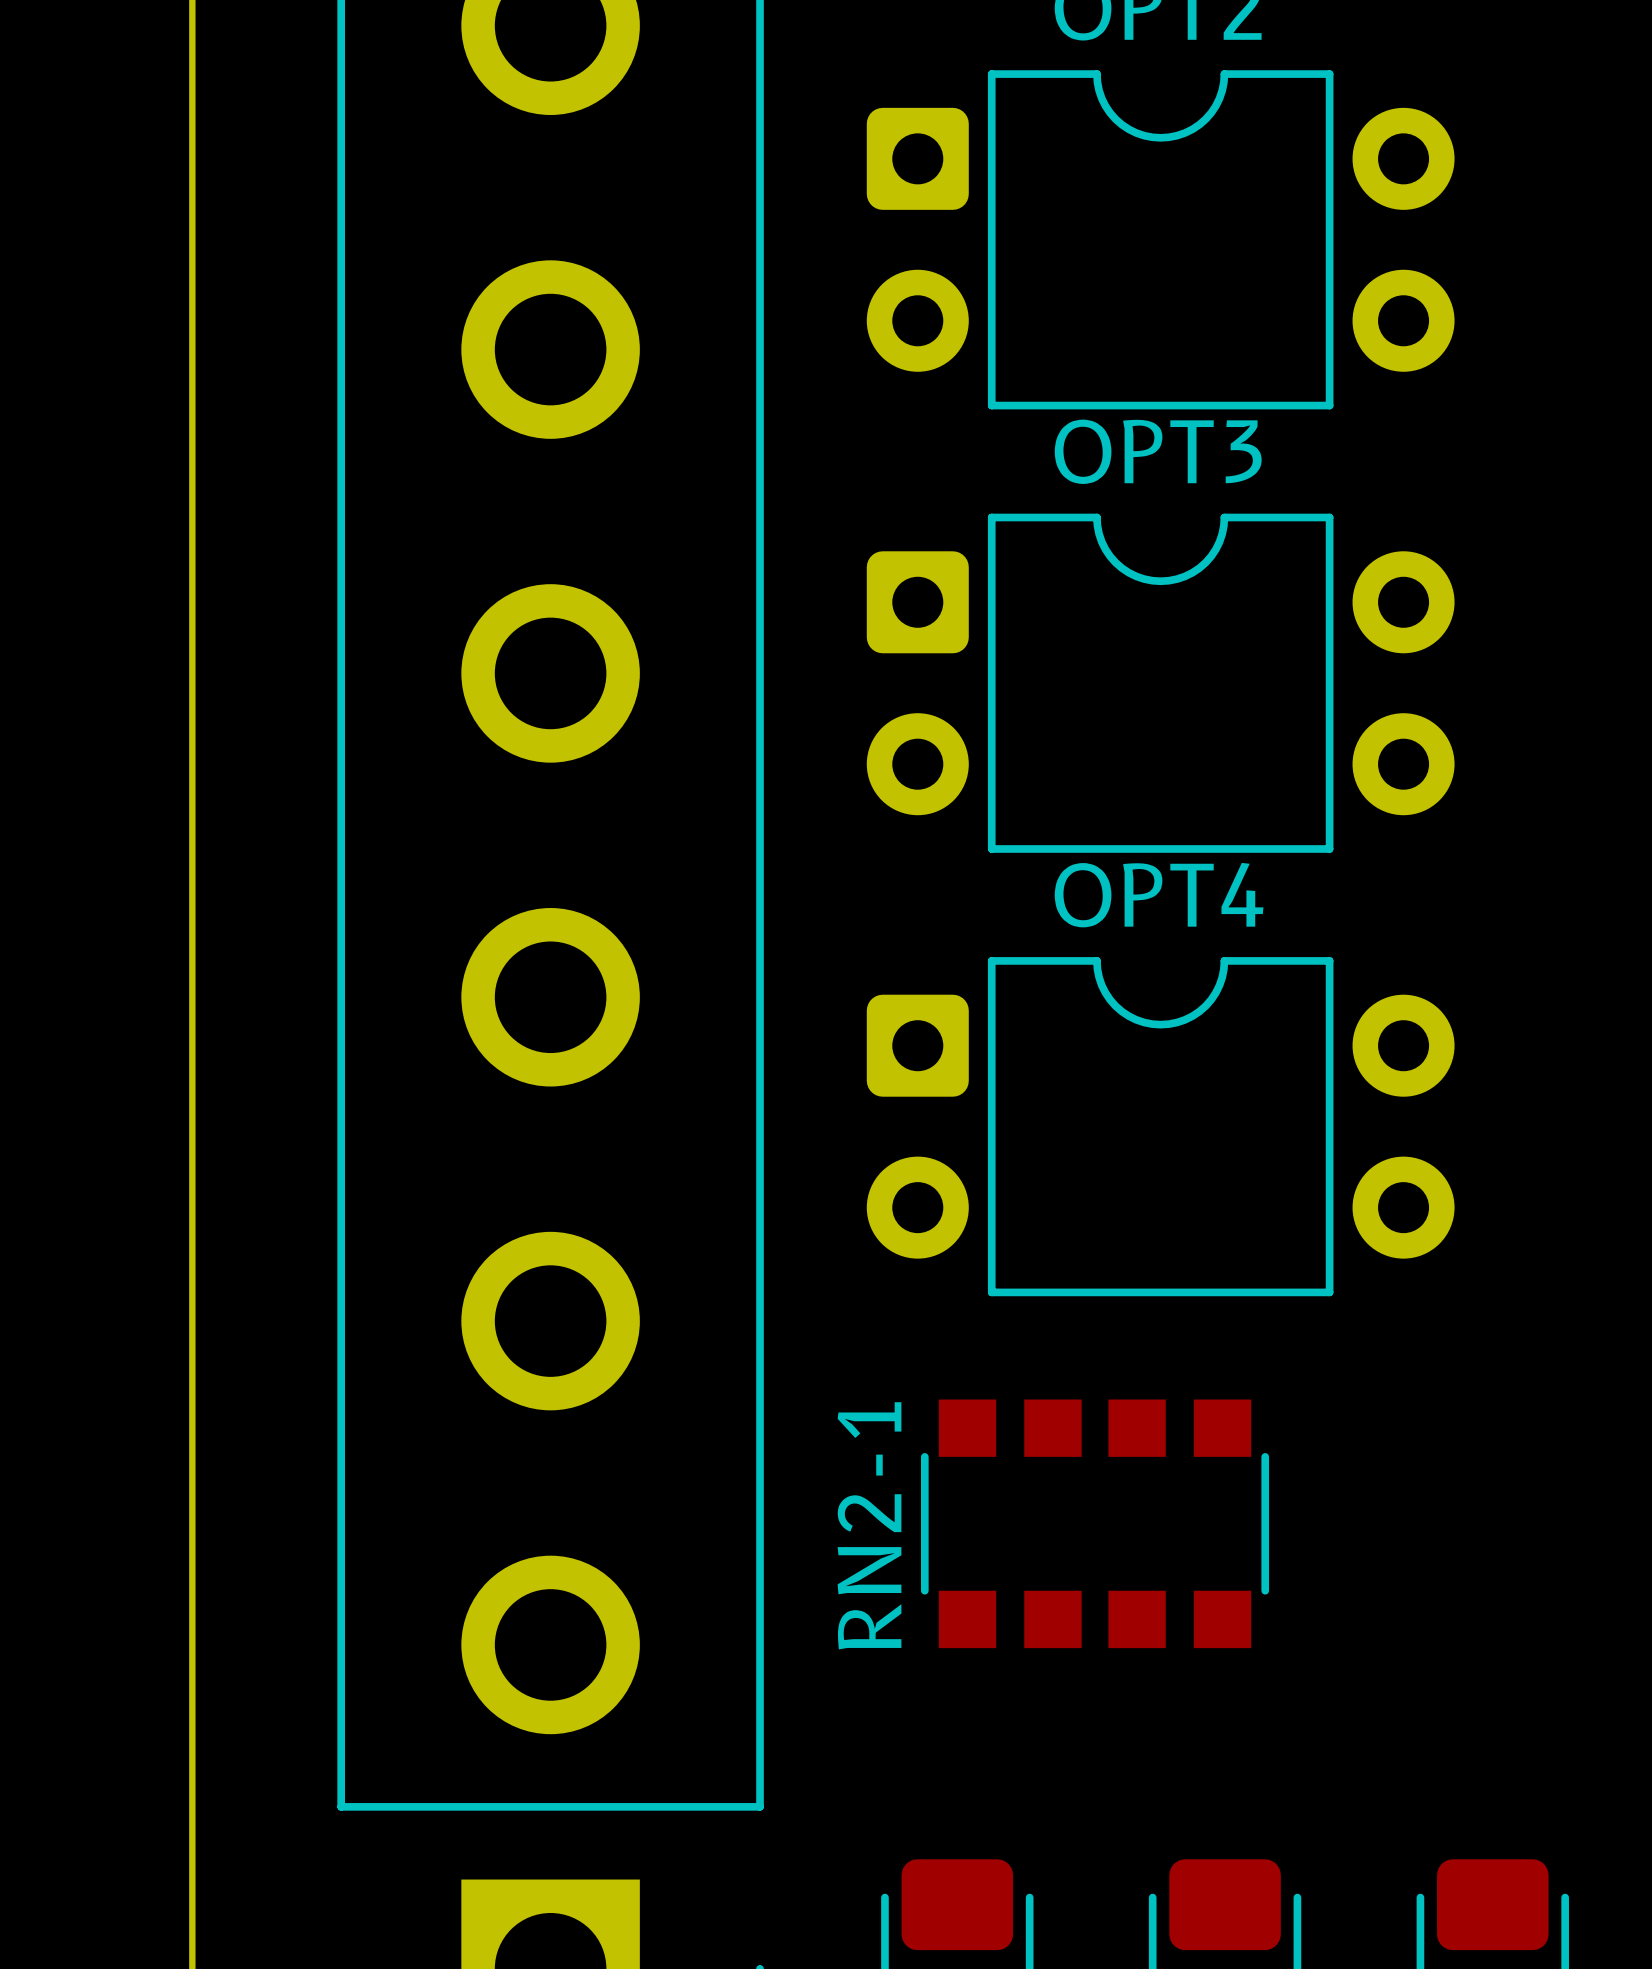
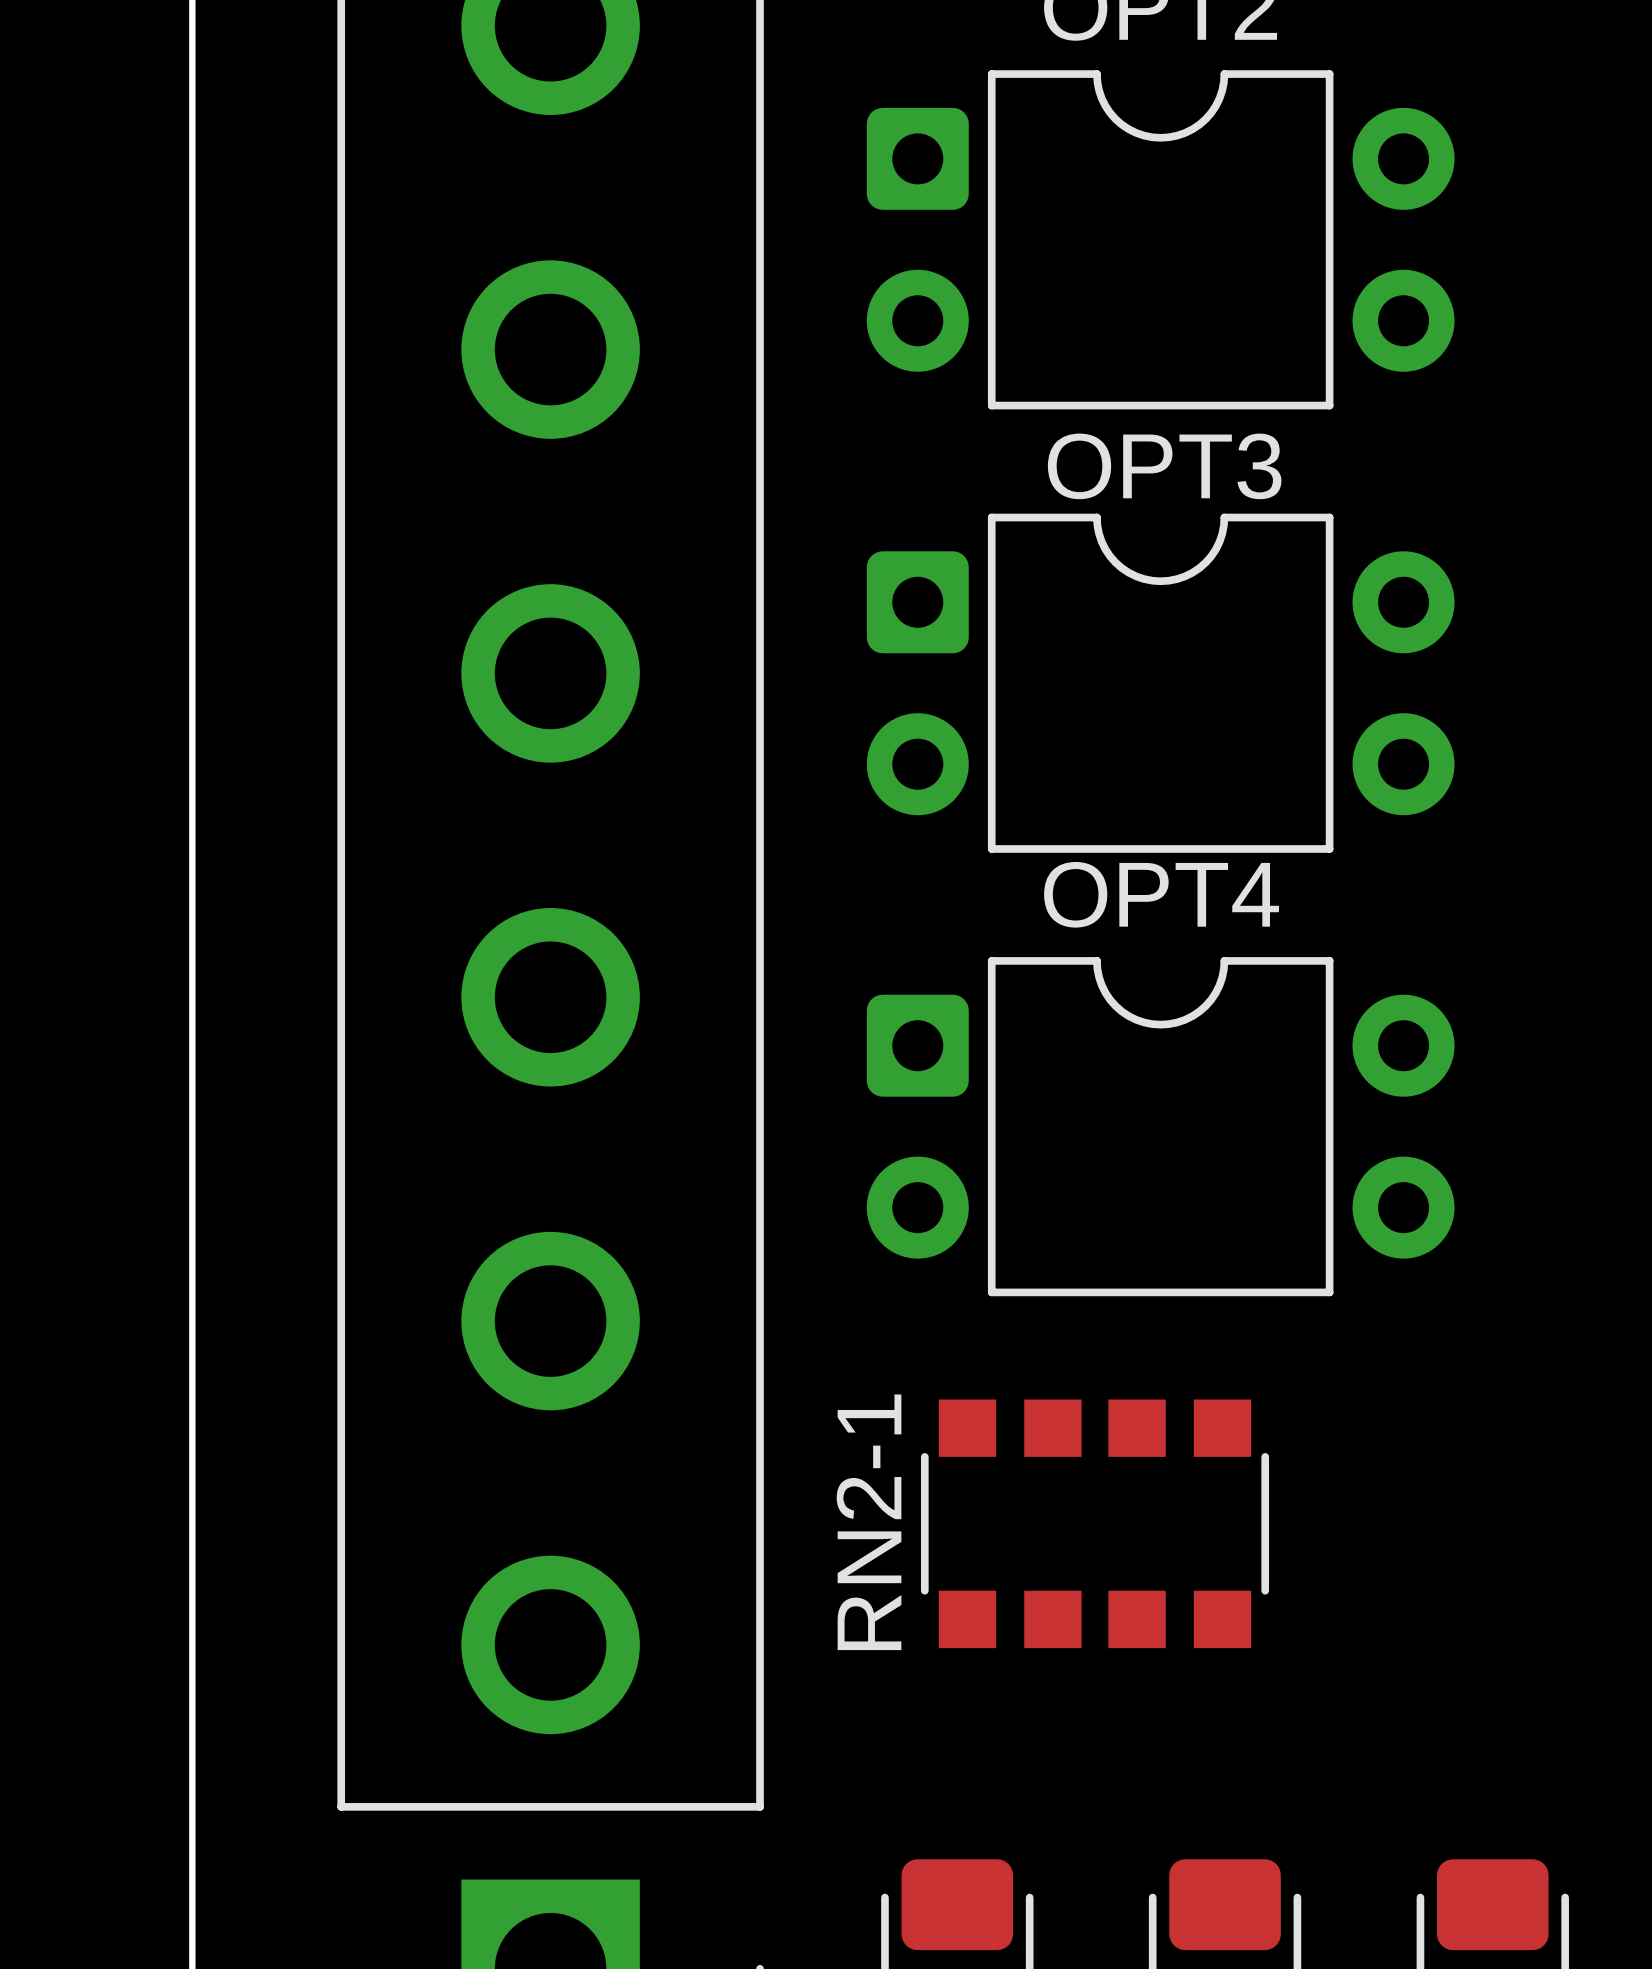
OPT3 name position: OPT3 (1158, 451) -> OPT3 (1164, 466)

